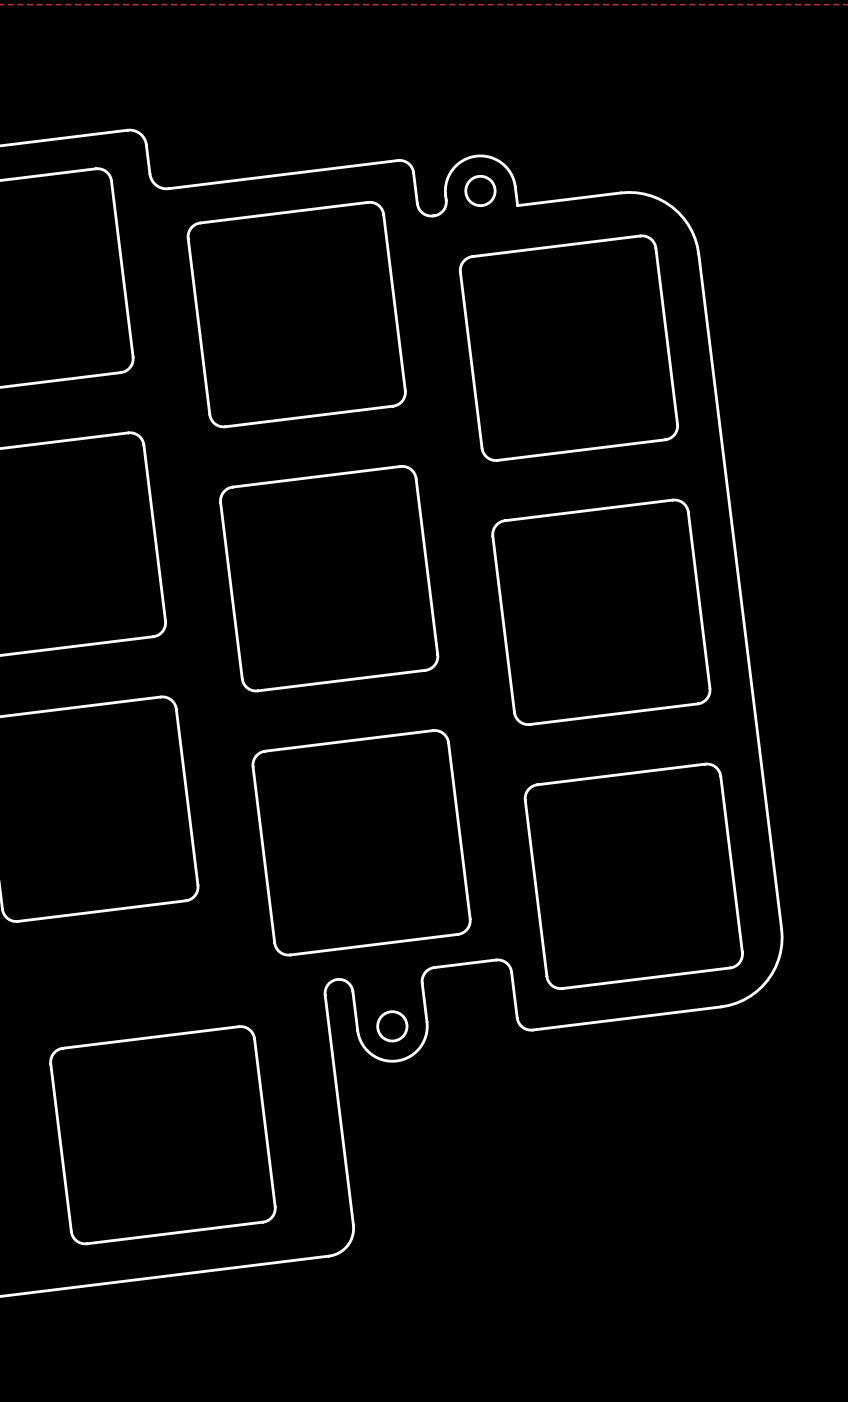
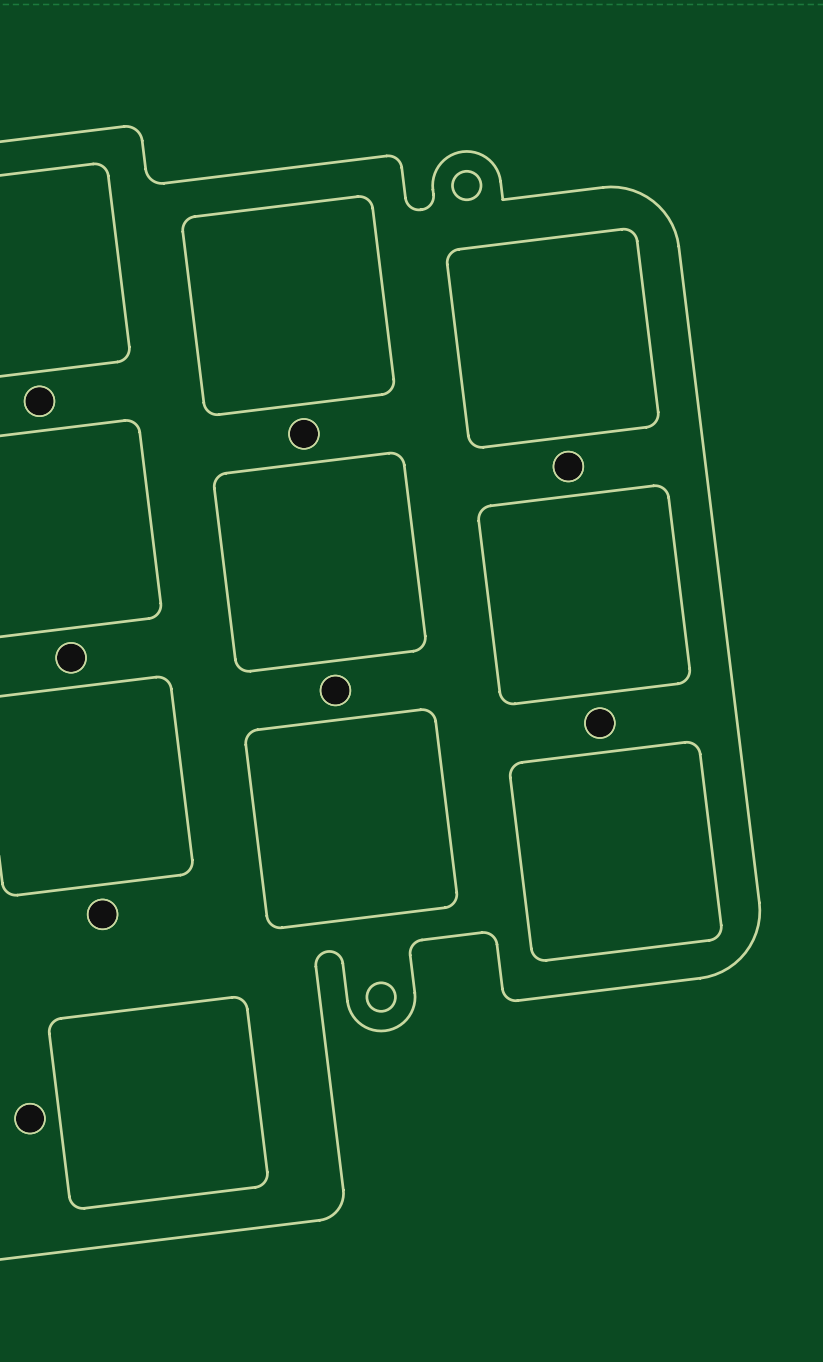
part: none -> (39, 401)
part: none -> (303, 433)
part: none -> (568, 466)
part: none -> (71, 657)
part: none -> (335, 690)
part: none -> (599, 723)
part: none -> (102, 914)
part: none -> (30, 1118)

